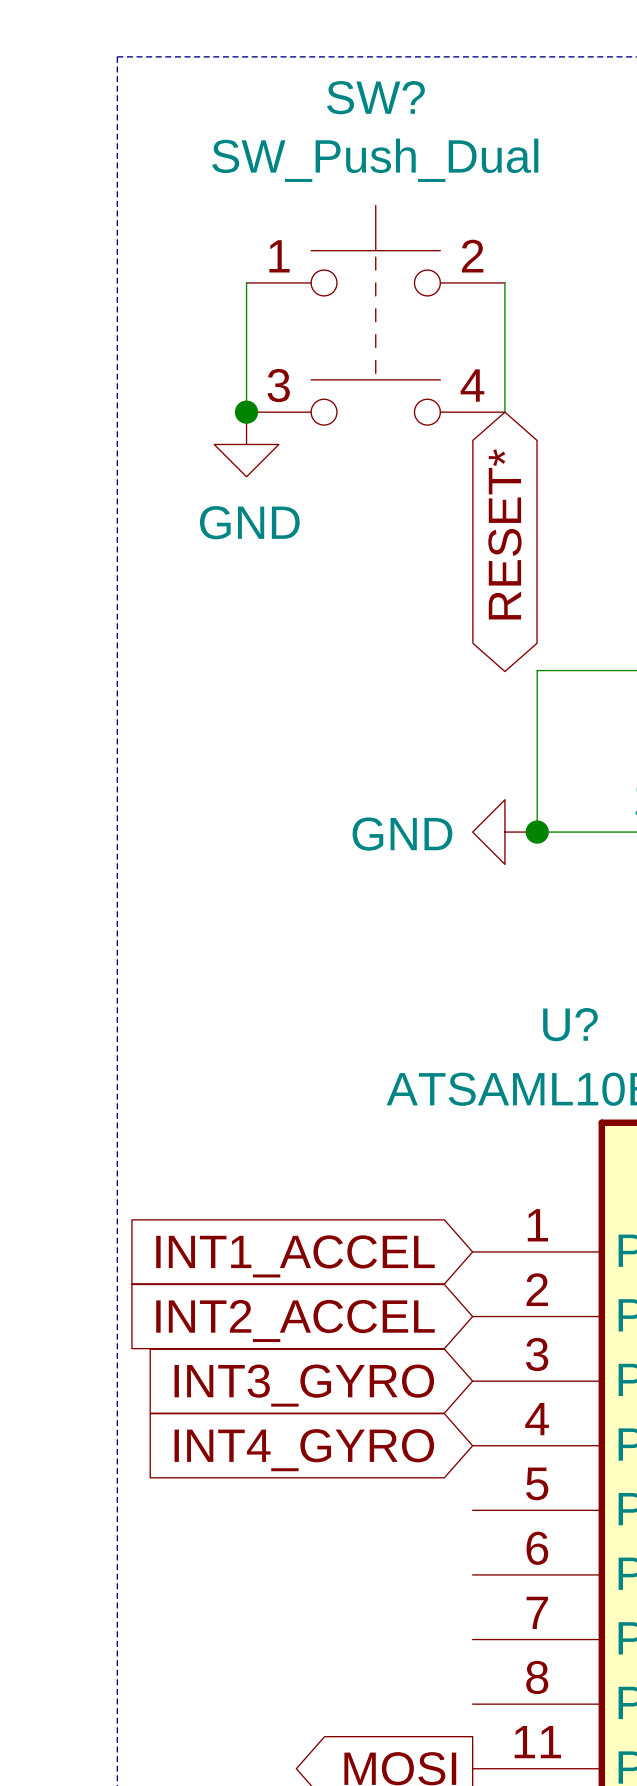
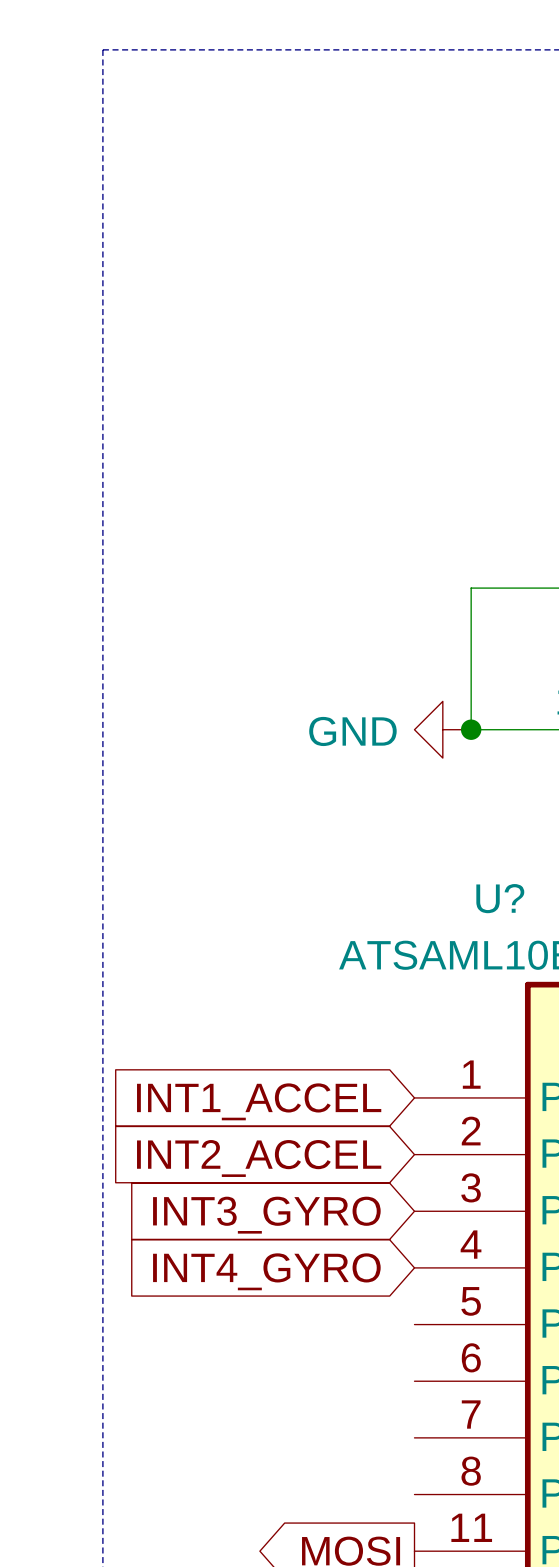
wire: (246, 282) (246, 412) -> none
wire: (504, 282) (504, 412) -> none
SW?: SW_Push_Dual (375, 315) -> none
junction: (246, 412) -> none
power symbol: GND (246, 444) -> none
global label: RESET* (504, 534) -> none

